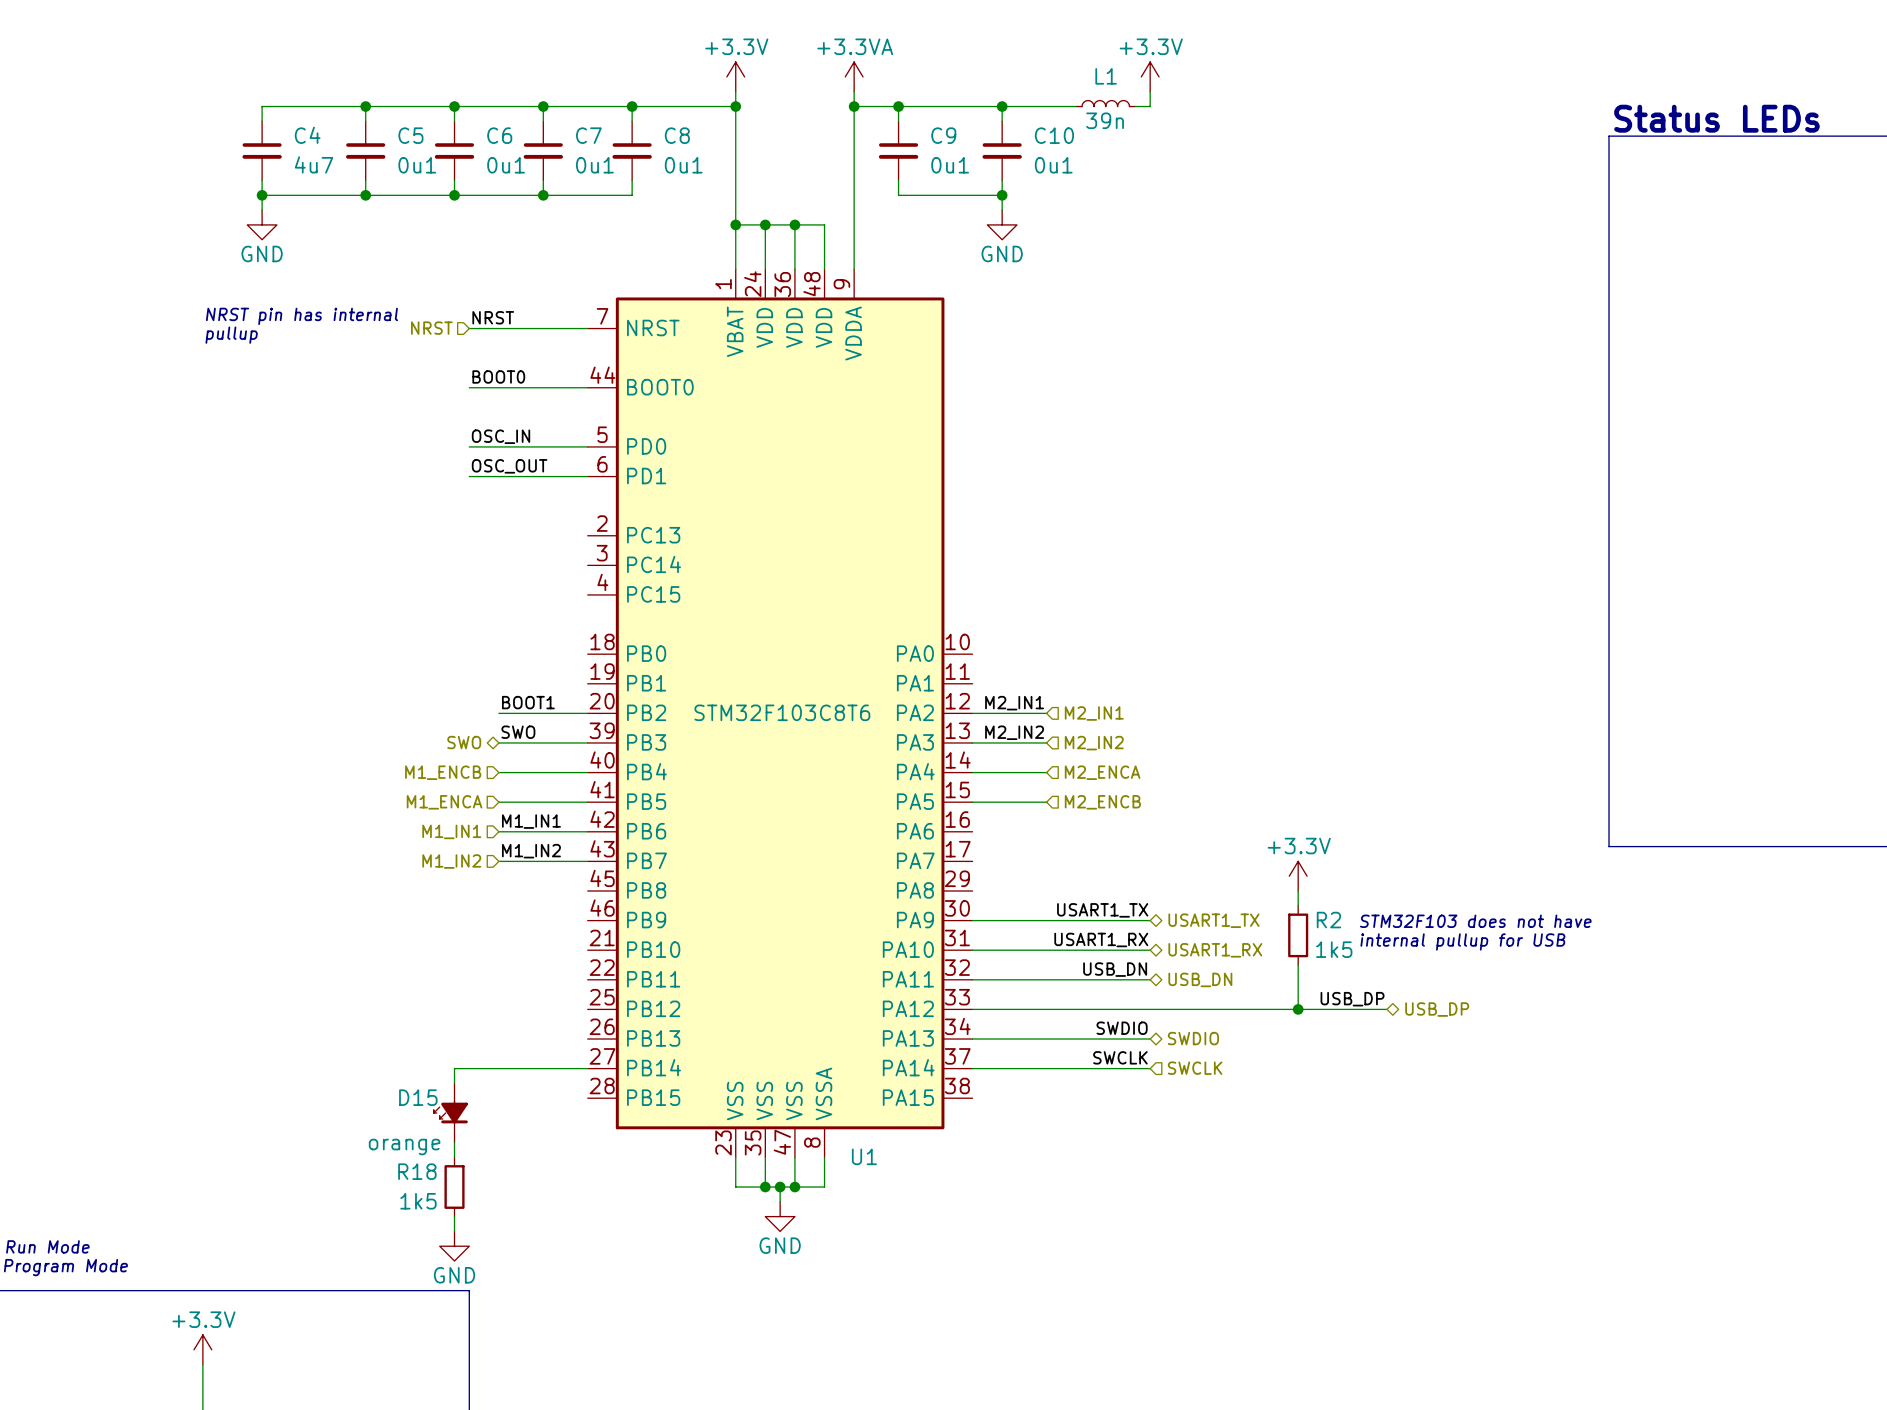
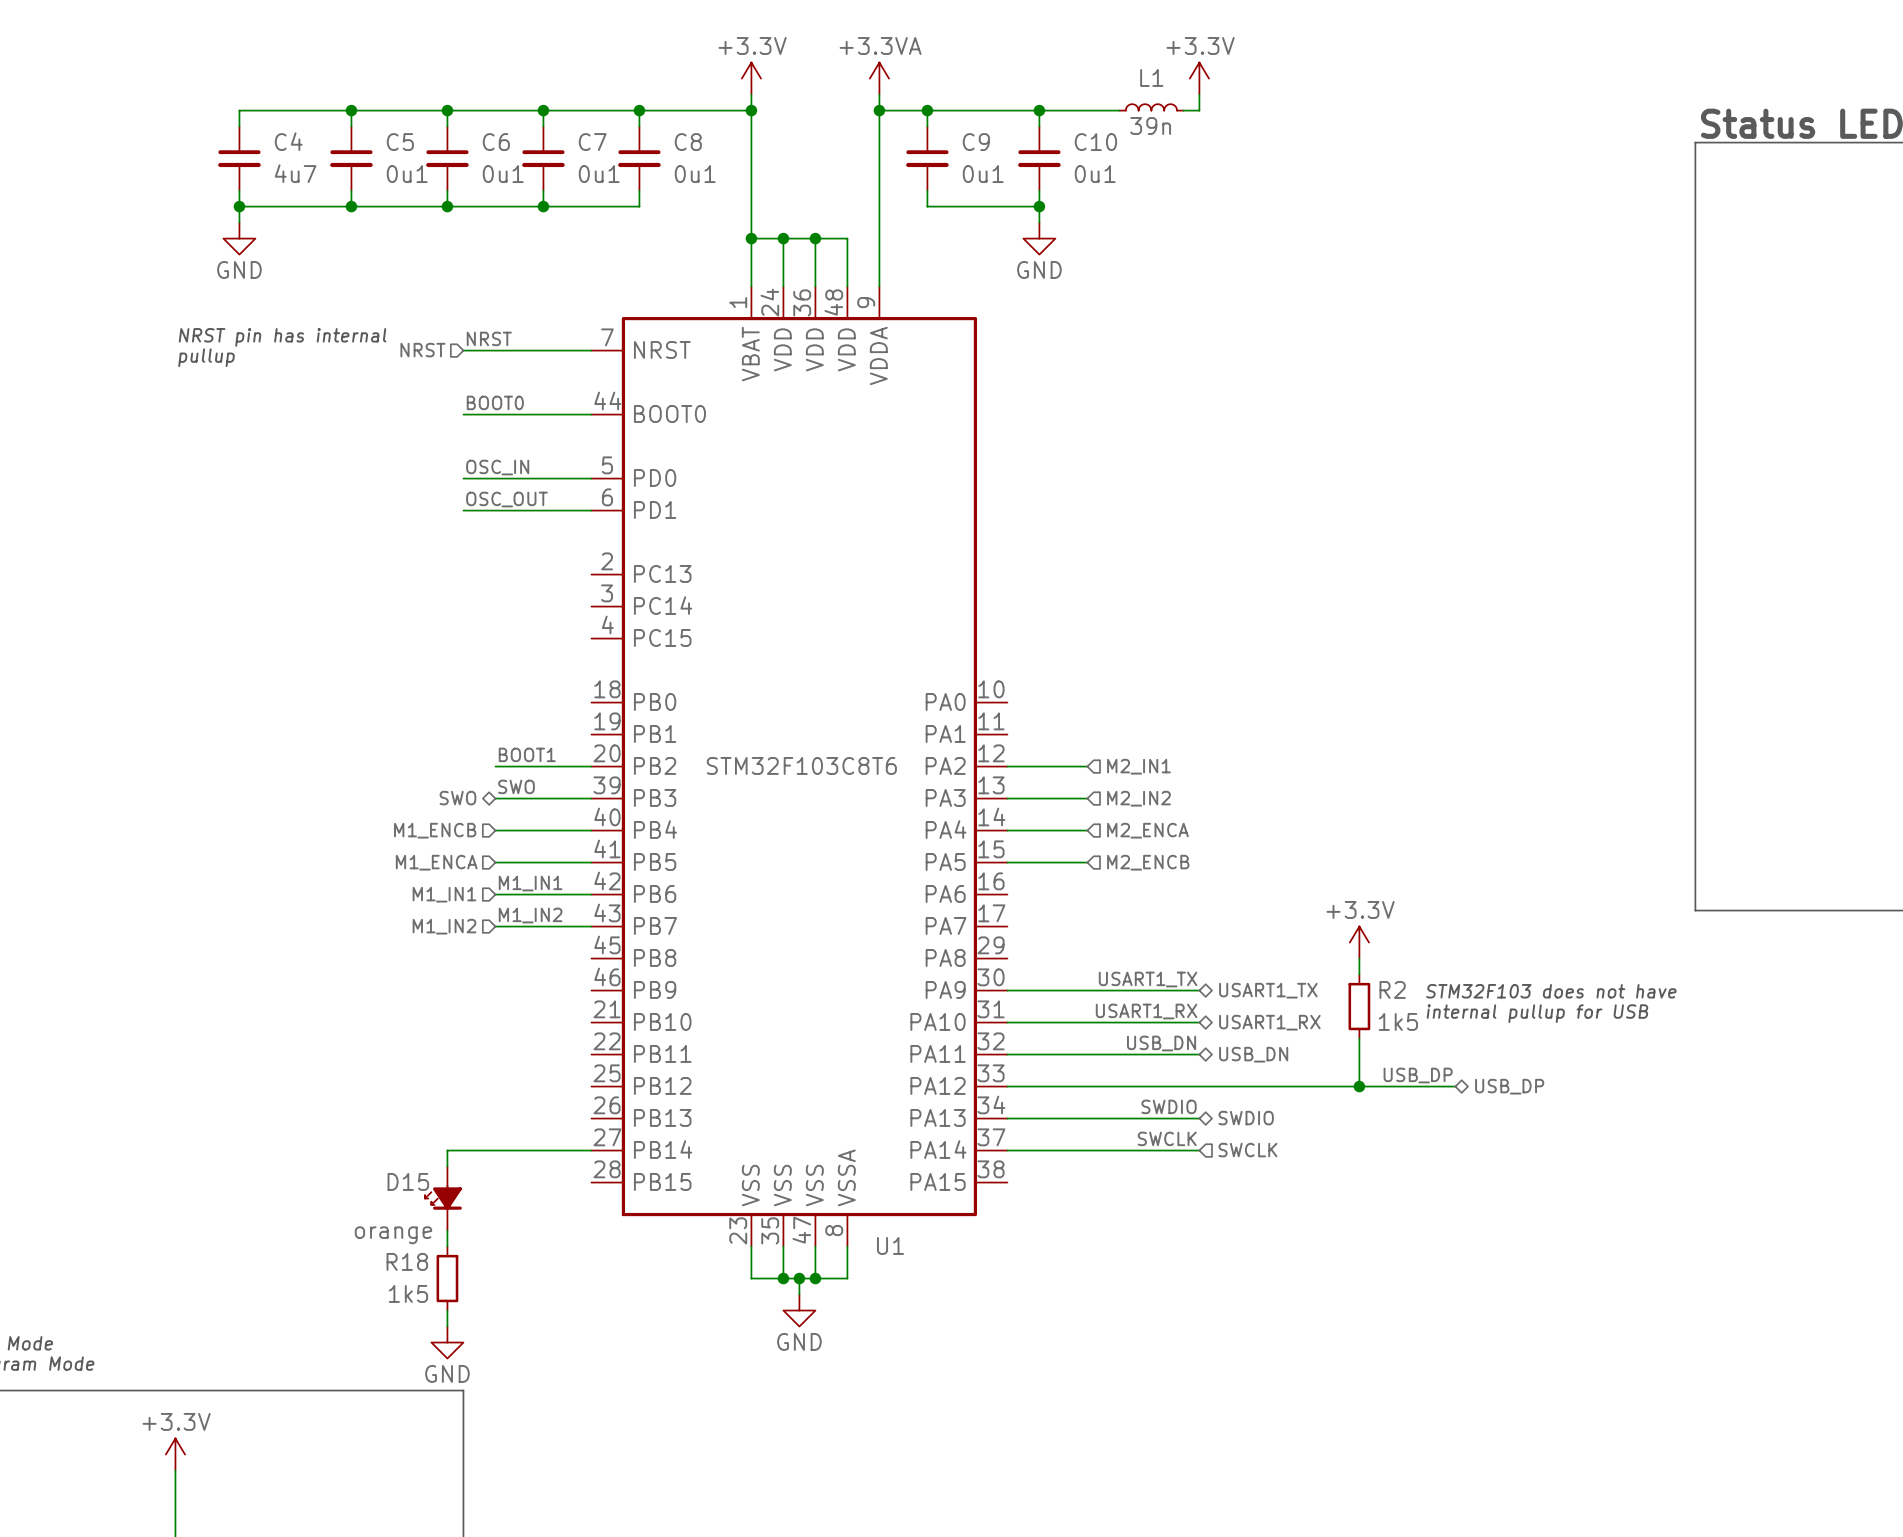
label: M2_IN1 (1014, 703) -> none
label: M2_IN2 (1014, 732) -> none

